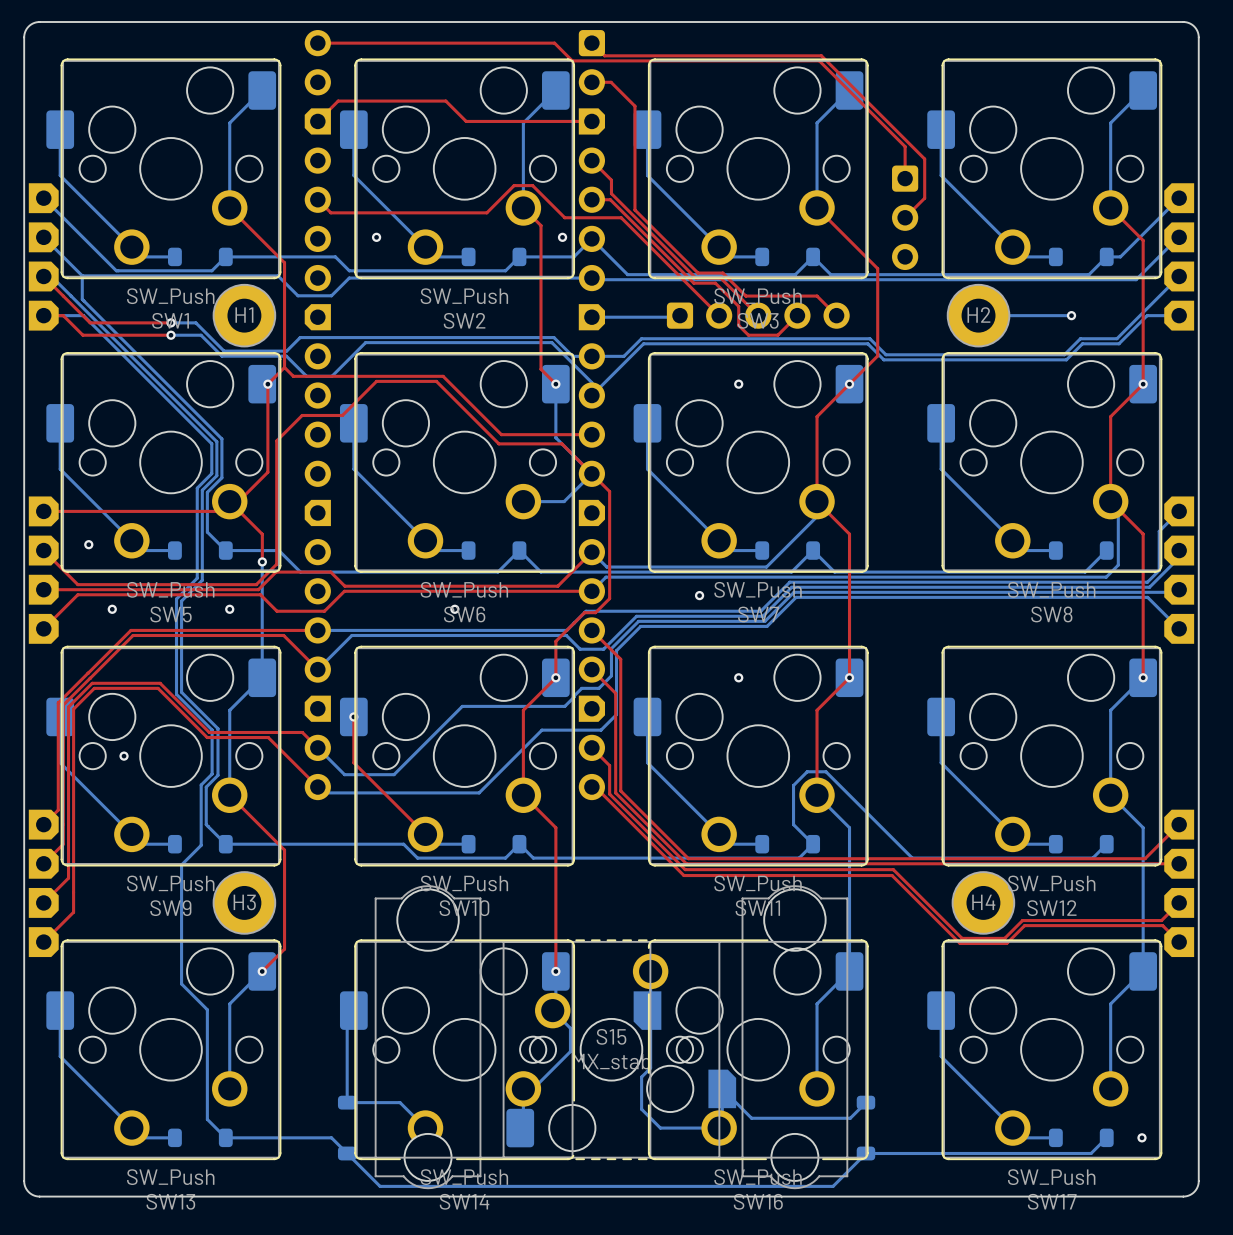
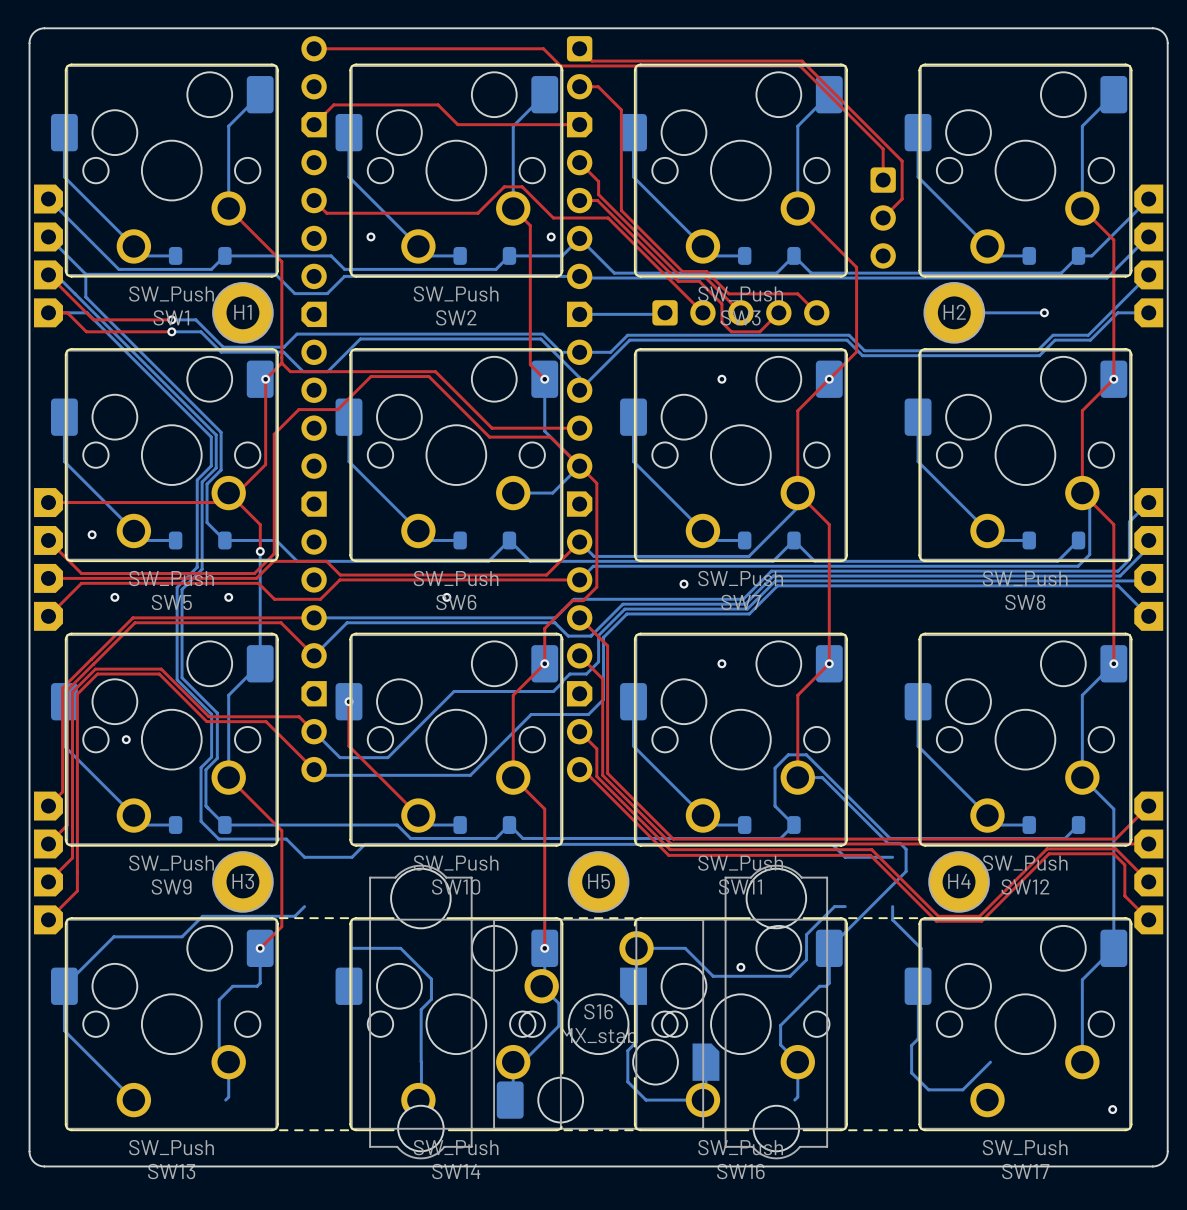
bottom track: (817, 795) (849, 827) (849, 971) (817, 1003) (817, 1088) -> (797, 777) (822, 777) (888, 843) (900, 843) (906, 849) (906, 871) (829, 948) (829, 983) (826, 986) (819, 986) (780, 1025) (780, 1044) (797, 1062) (797, 1097) (794, 1100)
bottom track: (201, 840) (201, 845) (181, 864) (181, 983) (207, 1009) (207, 1119) (225, 1137) (331, 1137) (380, 1186) (833, 1186) (865, 1153) (1091, 1153) (1106, 1137) -> (201, 821) (218, 839) (286, 839) (304, 857) (352, 857) (364, 844) (832, 844) (845, 857) (892, 857)
H5: none -> (598, 881)
top track: (1179, 902) (1161, 920) (1022, 920) -> (1148, 881) (1115, 848) (1047, 848) (996, 899)
top track: (1024, 925) (1162, 925) -> (999, 903) (1049, 853) (1113, 853) (1124, 864) (1124, 895) (1132, 903)
bottom track: none -> (304, 906) (294, 916) (202, 916) (182, 936) (113, 936) (64, 986)
bottom track: none -> (845, 906) (834, 906) (806, 934) (806, 959) (790, 976) (713, 976) (685, 948) (636, 948)
bottom track: none -> (892, 906) (892, 919) (921, 948) (921, 983) (918, 986) (918, 1038) (911, 1045) (911, 1072) (928, 1089) (962, 1089) (990, 1062)
line: none -> (279, 918) (287, 918)
line: none -> (295, 918) (302, 918)
line: none -> (310, 918) (317, 918)
line: none -> (325, 918) (333, 918)
line: none -> (340, 918) (348, 918)
line: none -> (849, 918) (856, 918)
line: none -> (864, 918) (871, 918)
line: none -> (879, 918) (886, 918)
line: none -> (894, 918) (902, 918)
line: none -> (909, 918) (917, 918)
bottom track: (262, 971) (229, 1003) (229, 1088) -> (260, 948) (260, 983) (257, 986) (232, 986) (219, 999) (219, 1052) (228, 1062) (228, 1097) (225, 1100)
via: none -> (740, 967)
bottom track: (353, 1010) (347, 1017) (347, 1102) (400, 1102) (425, 1128) -> (352, 948) (400, 948) (431, 979) (431, 999) (421, 1009) (421, 1097) (418, 1100)
bottom track: (941, 1010) (941, 1056) (1022, 1137) (1055, 1137) -> none
S15 name: S15 (611, 1036) -> S16 (598, 1011)
bottom track: (722, 1088) (751, 1118) (850, 1118) (865, 1102) -> none
part: (347, 1128) -> none
part: (865, 1128) -> none
bottom track: (141, 1137) (174, 1137) -> none
part: (200, 1137) -> none
part: (1081, 1137) -> none
line: none -> (279, 1130) (287, 1130)
line: none -> (295, 1130) (302, 1130)
line: none -> (310, 1130) (317, 1130)
line: none -> (325, 1130) (333, 1130)
line: none -> (340, 1130) (348, 1130)
line: none -> (849, 1130) (856, 1130)
line: none -> (864, 1130) (871, 1130)
line: none -> (879, 1130) (886, 1130)
line: none -> (894, 1130) (902, 1130)
line: none -> (909, 1130) (917, 1130)

